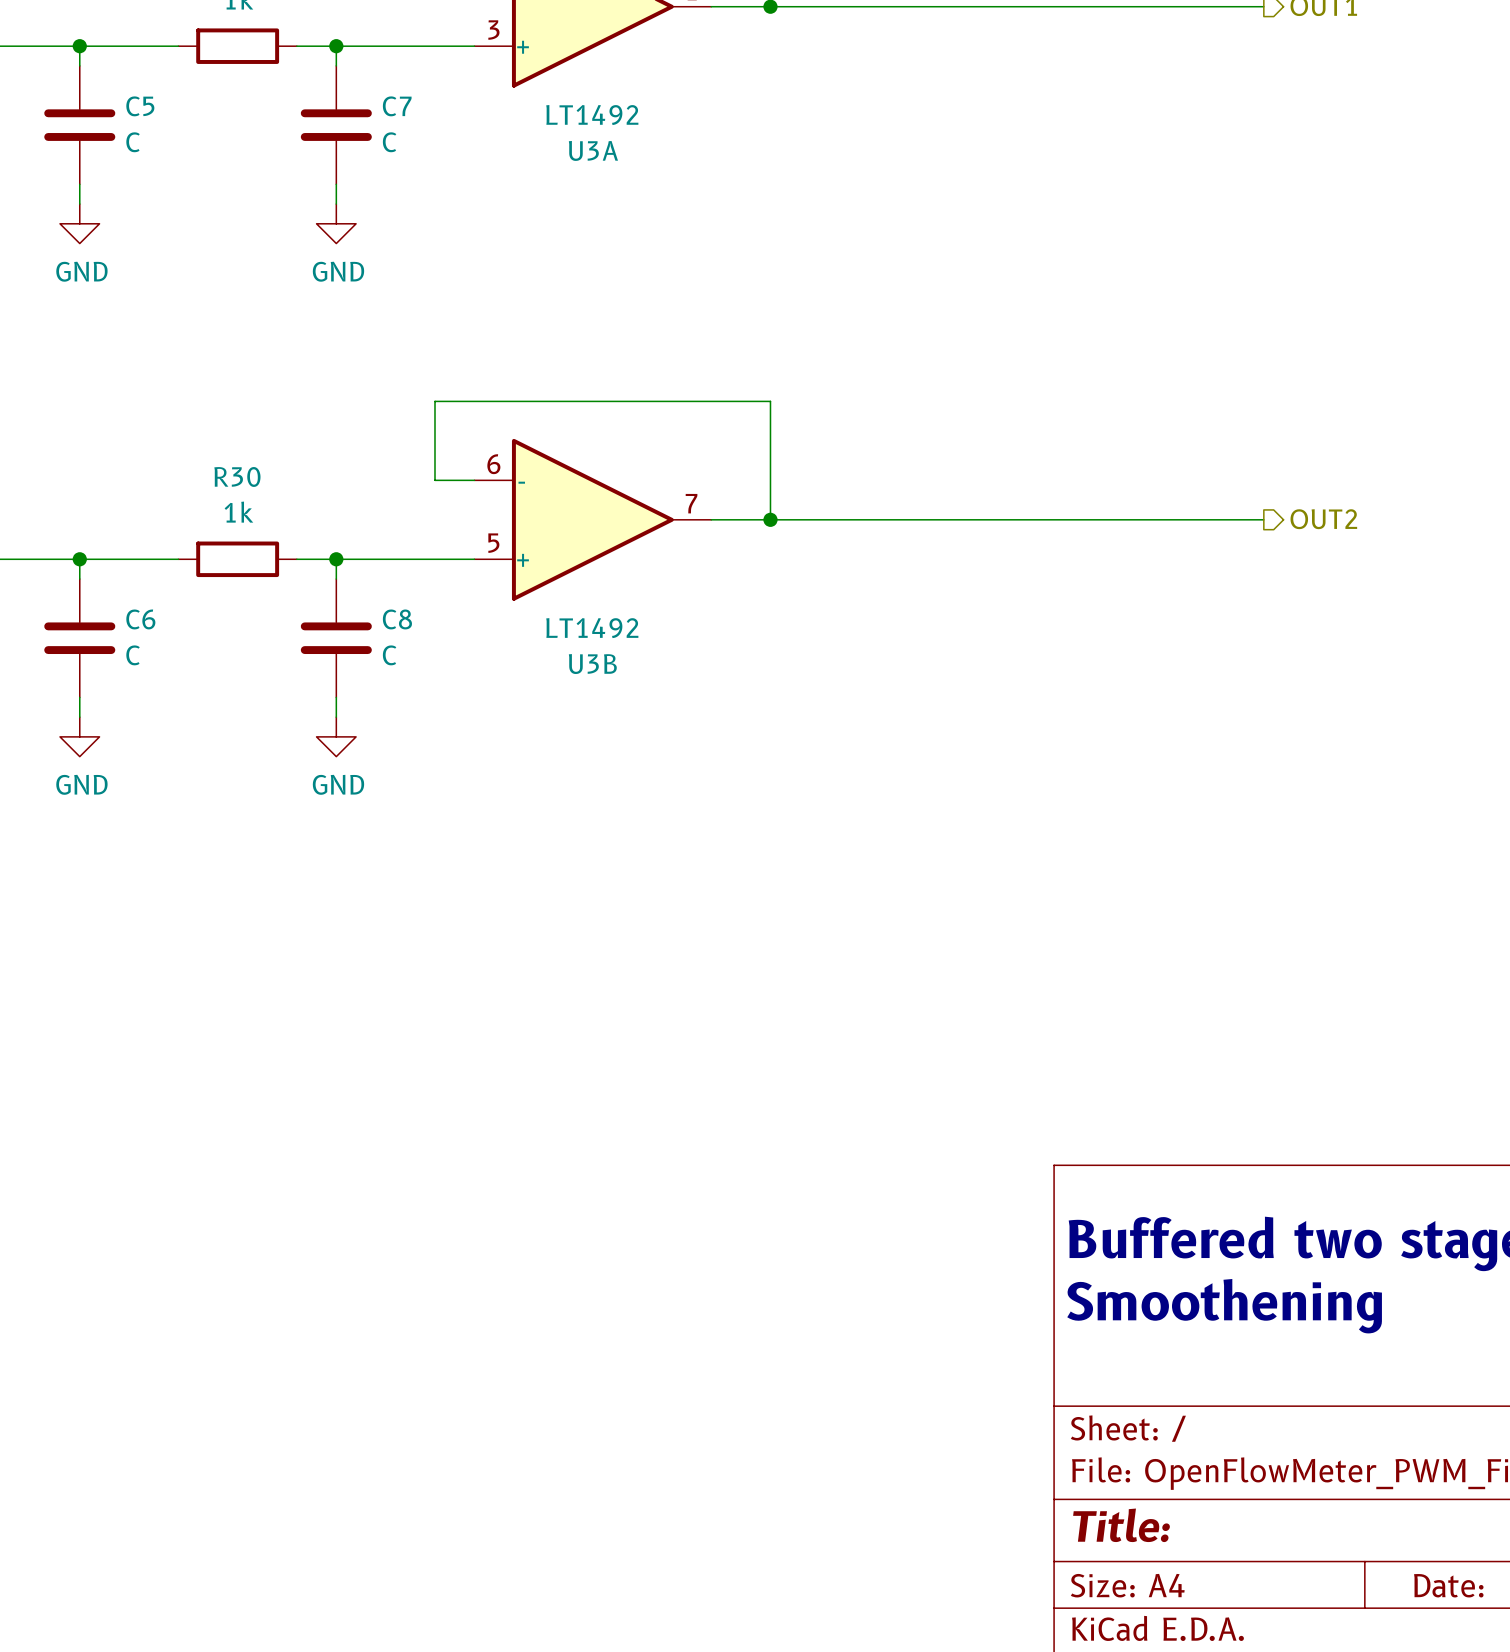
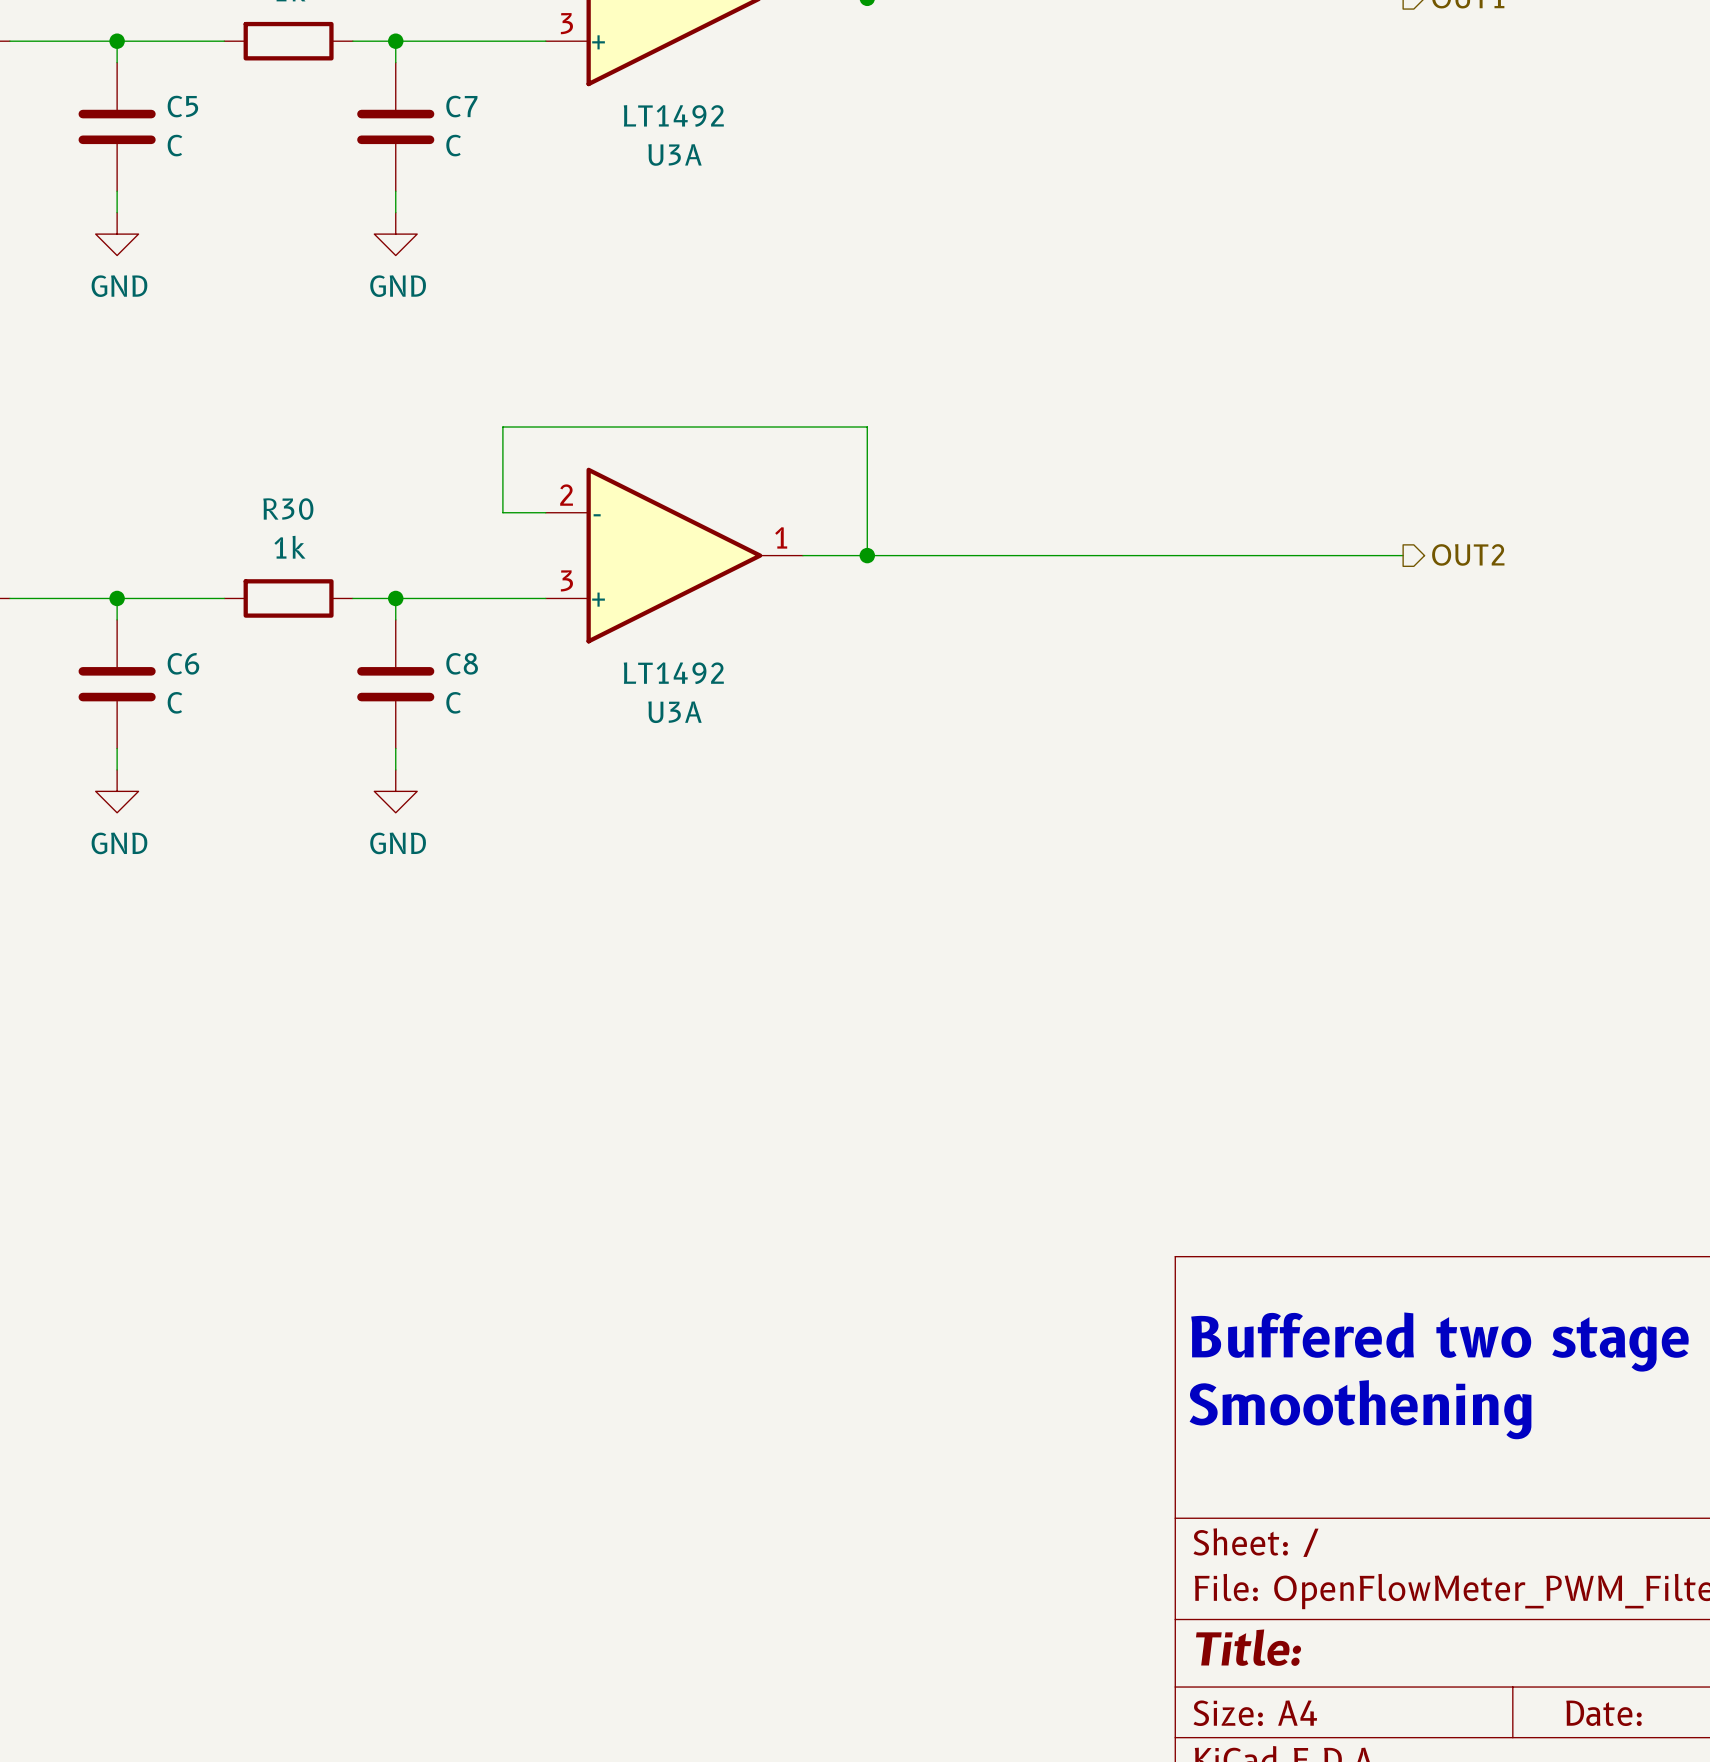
U3B pin number: 6 (493, 464) -> 2 (566, 495)
U3B pin number: 7 (691, 503) -> 1 (781, 537)
U3B pin number: 5 (493, 543) -> 3 (566, 580)
U3B name: U3B (592, 664) -> U3A (674, 712)

